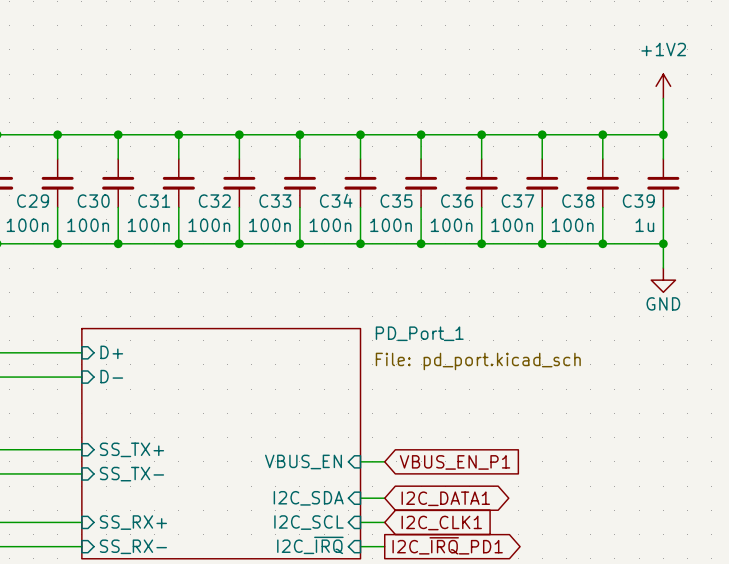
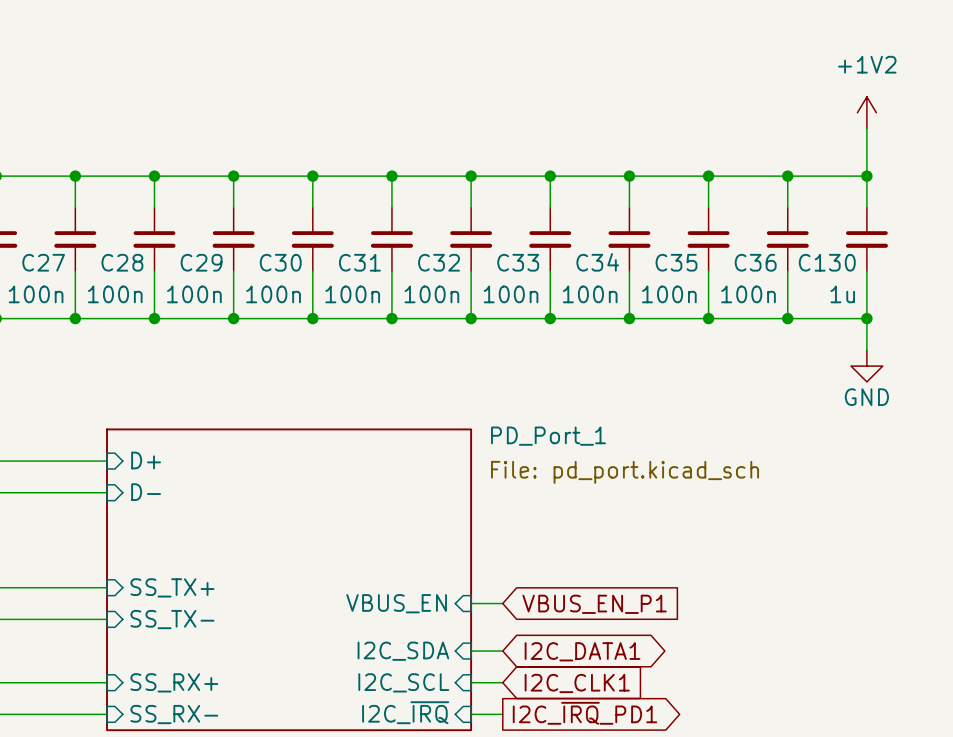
C34 name: C34 (336, 200) -> C32 (439, 262)
C29 name: C29 (33, 201) -> C27 (43, 262)
C30 name: C30 (93, 201) -> C28 (122, 262)
C31 name: C31 (154, 201) -> C29 (201, 262)
C32 name: C32 (214, 201) -> C30 (280, 262)
C33 name: C33 (275, 201) -> C31 (359, 262)
C35 name: C35 (396, 201) -> C33 (518, 262)
C36 name: C36 (457, 201) -> C34 (597, 262)
C37 name: C37 (517, 201) -> C35 (676, 262)
C38 name: C38 (578, 201) -> C36 (755, 262)
C39 name: C39 (638, 201) -> C130 (827, 262)

